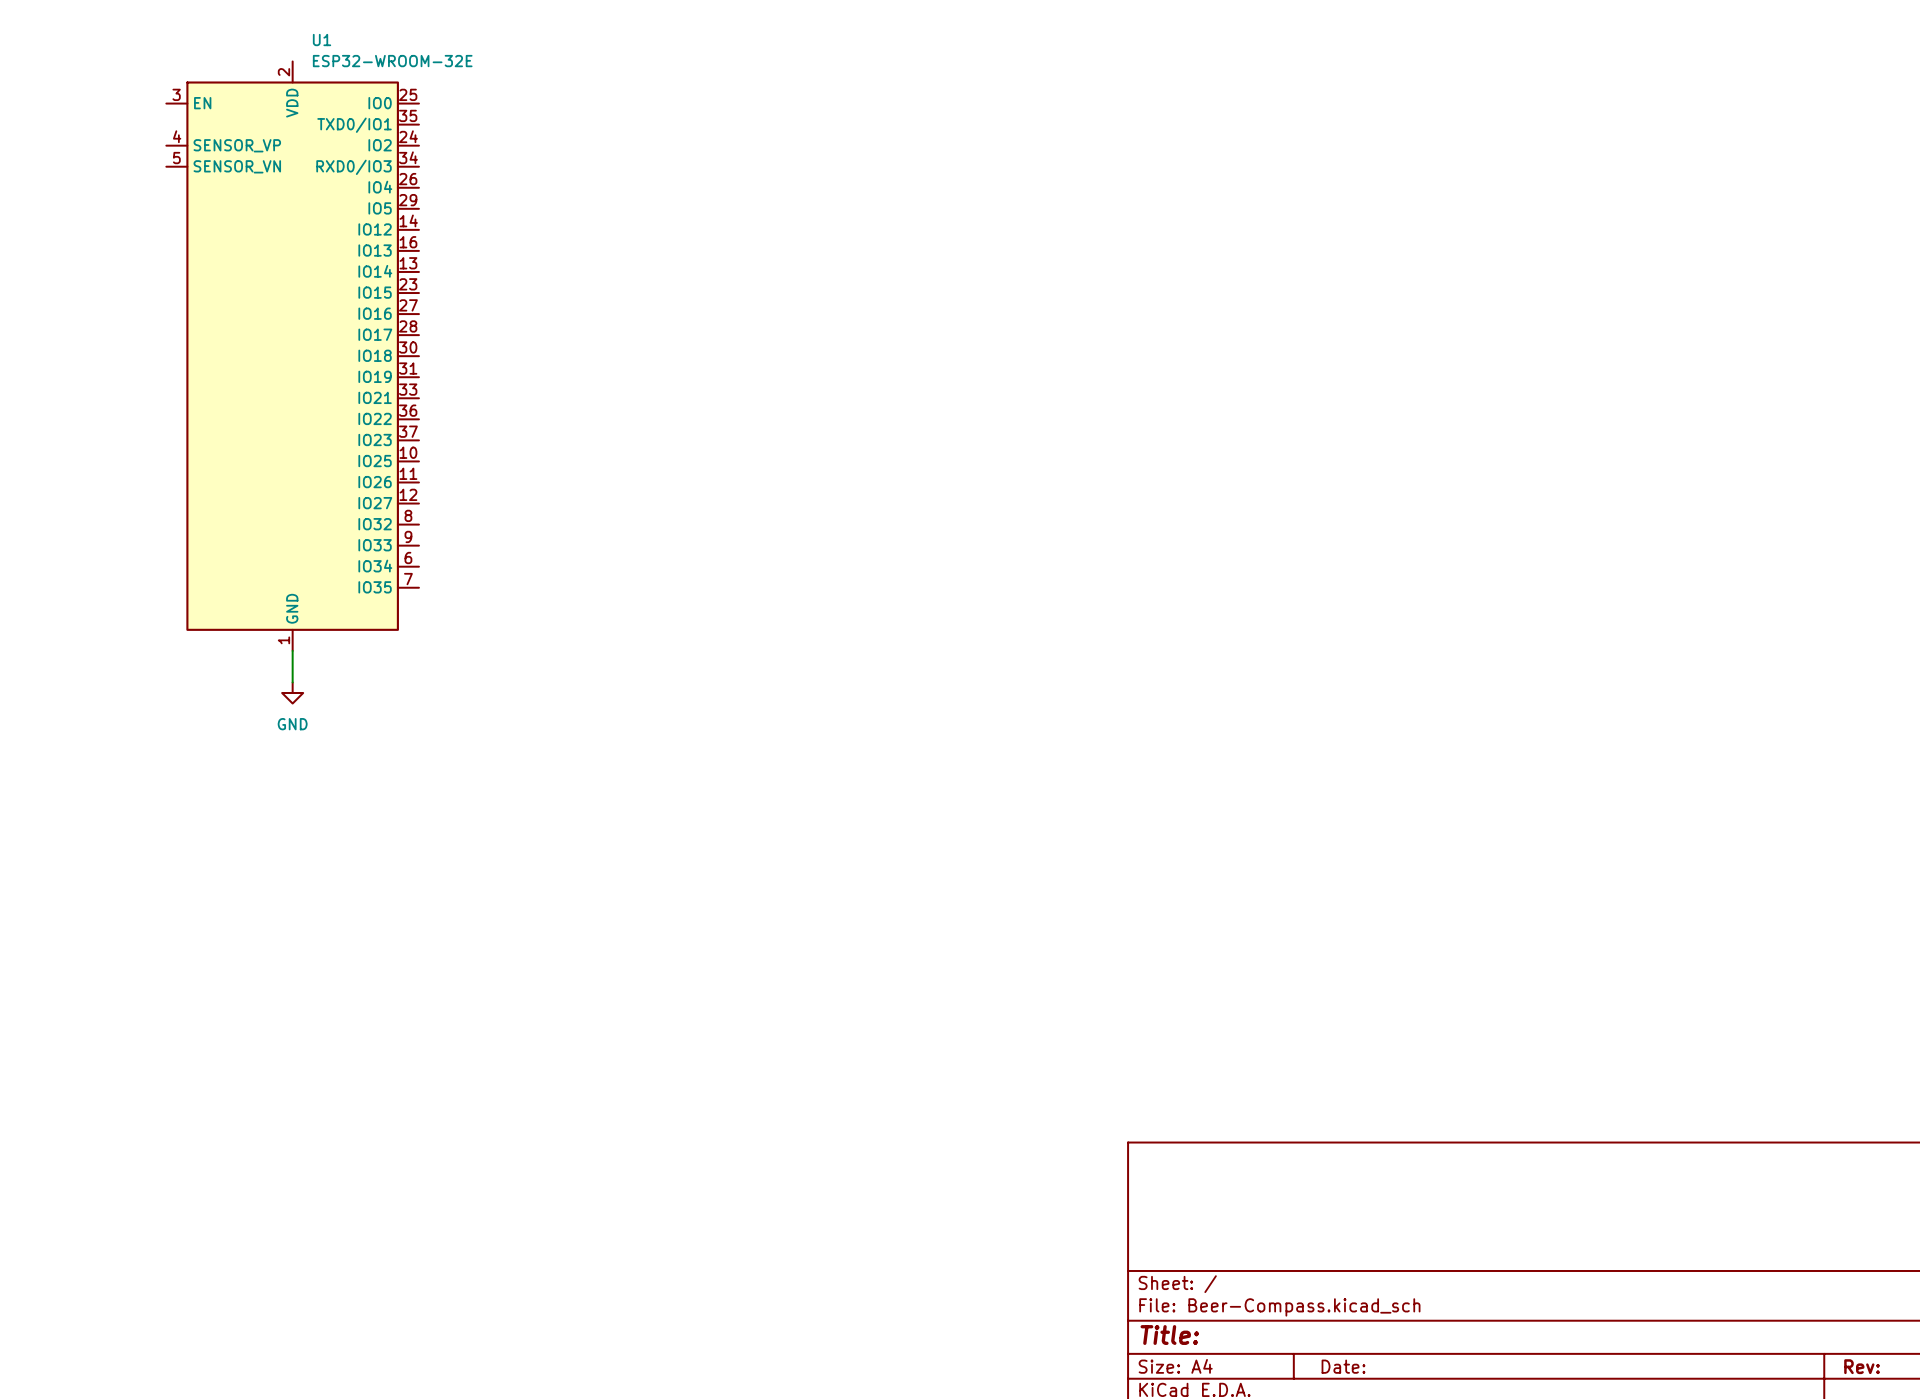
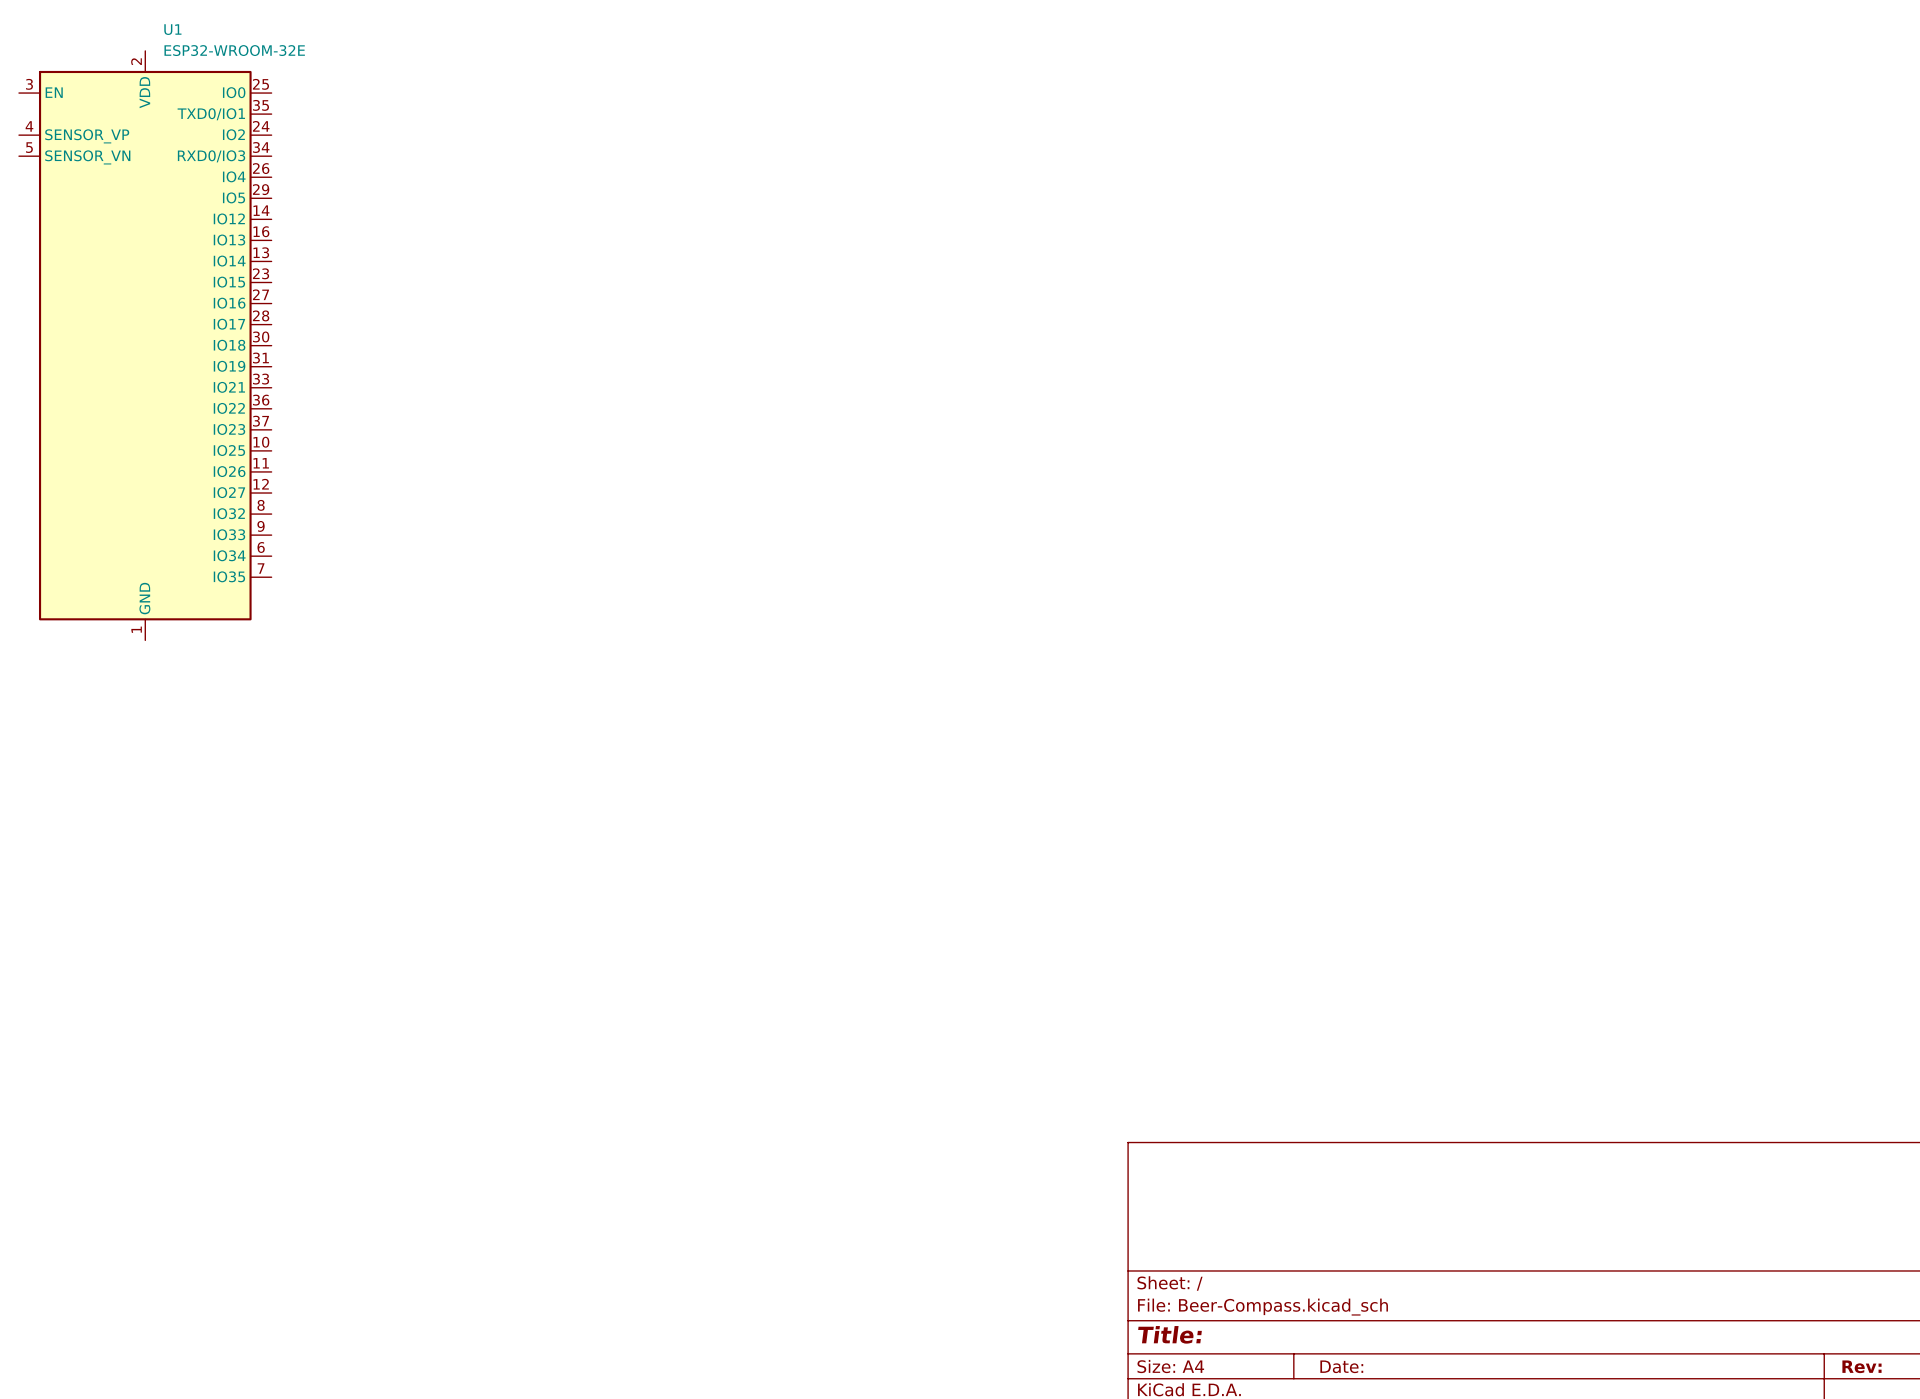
U1 position: (292, 356) -> (145, 345)
wire: (292, 650) (292, 682) -> none
power symbol: GND (292, 692) -> none

